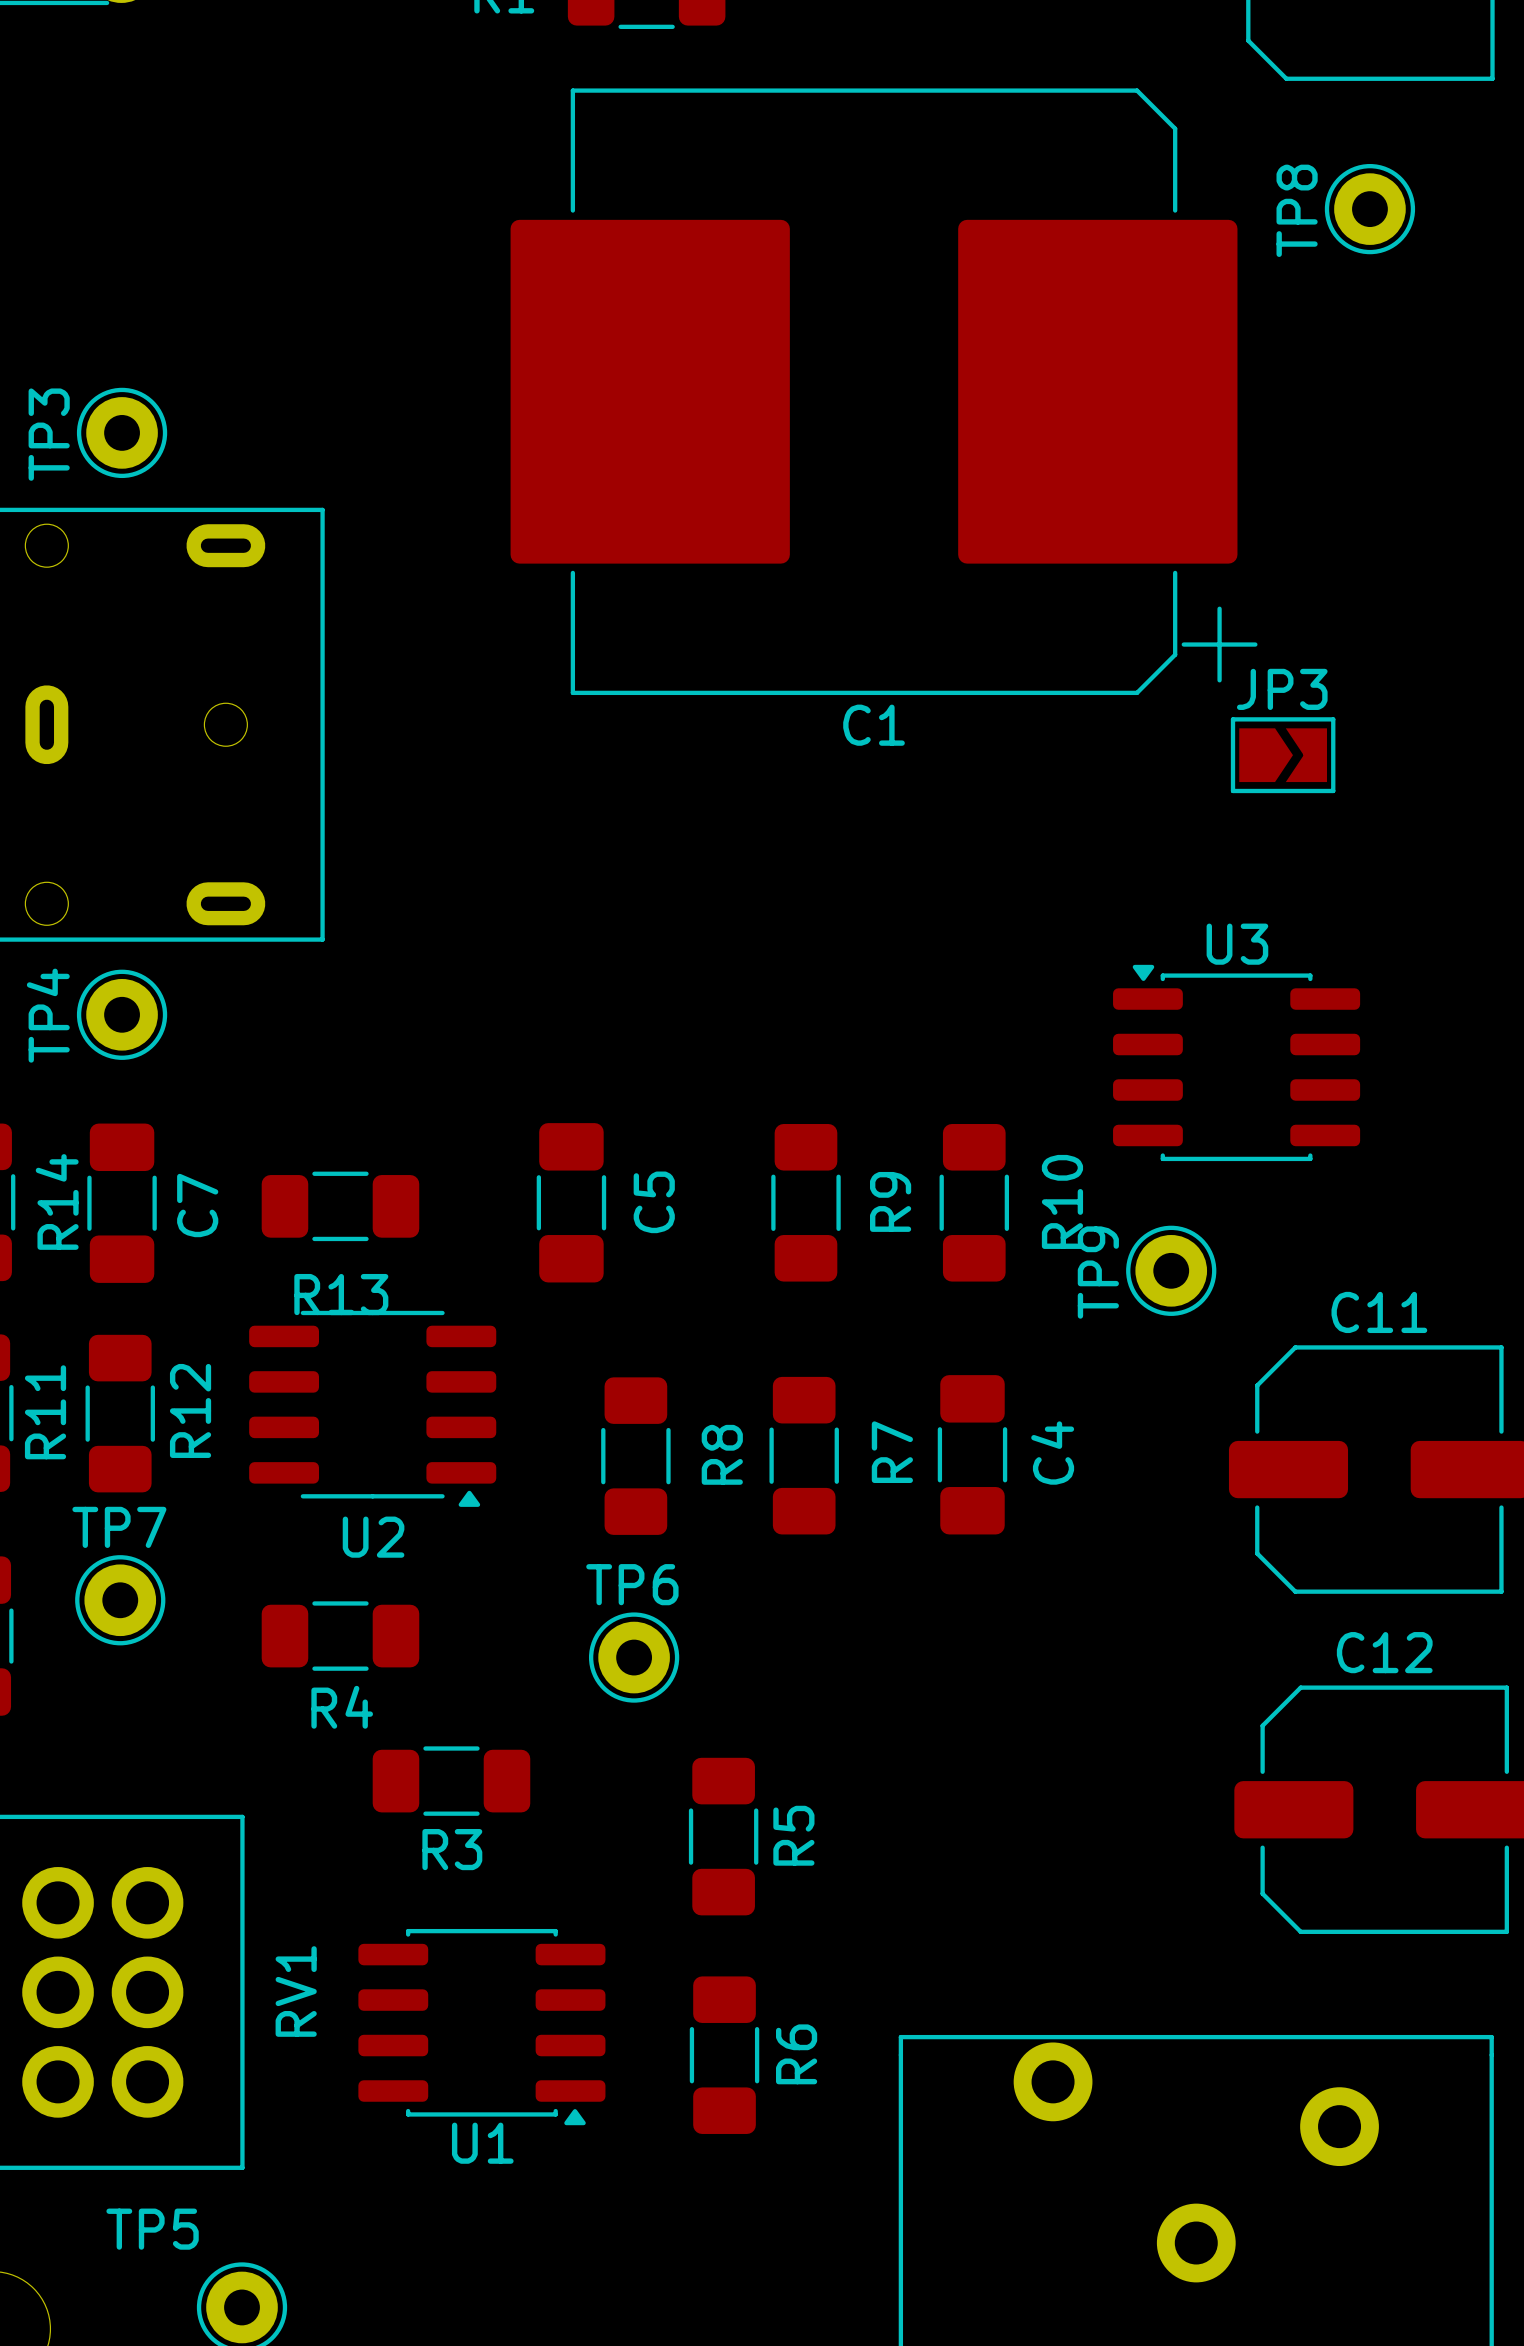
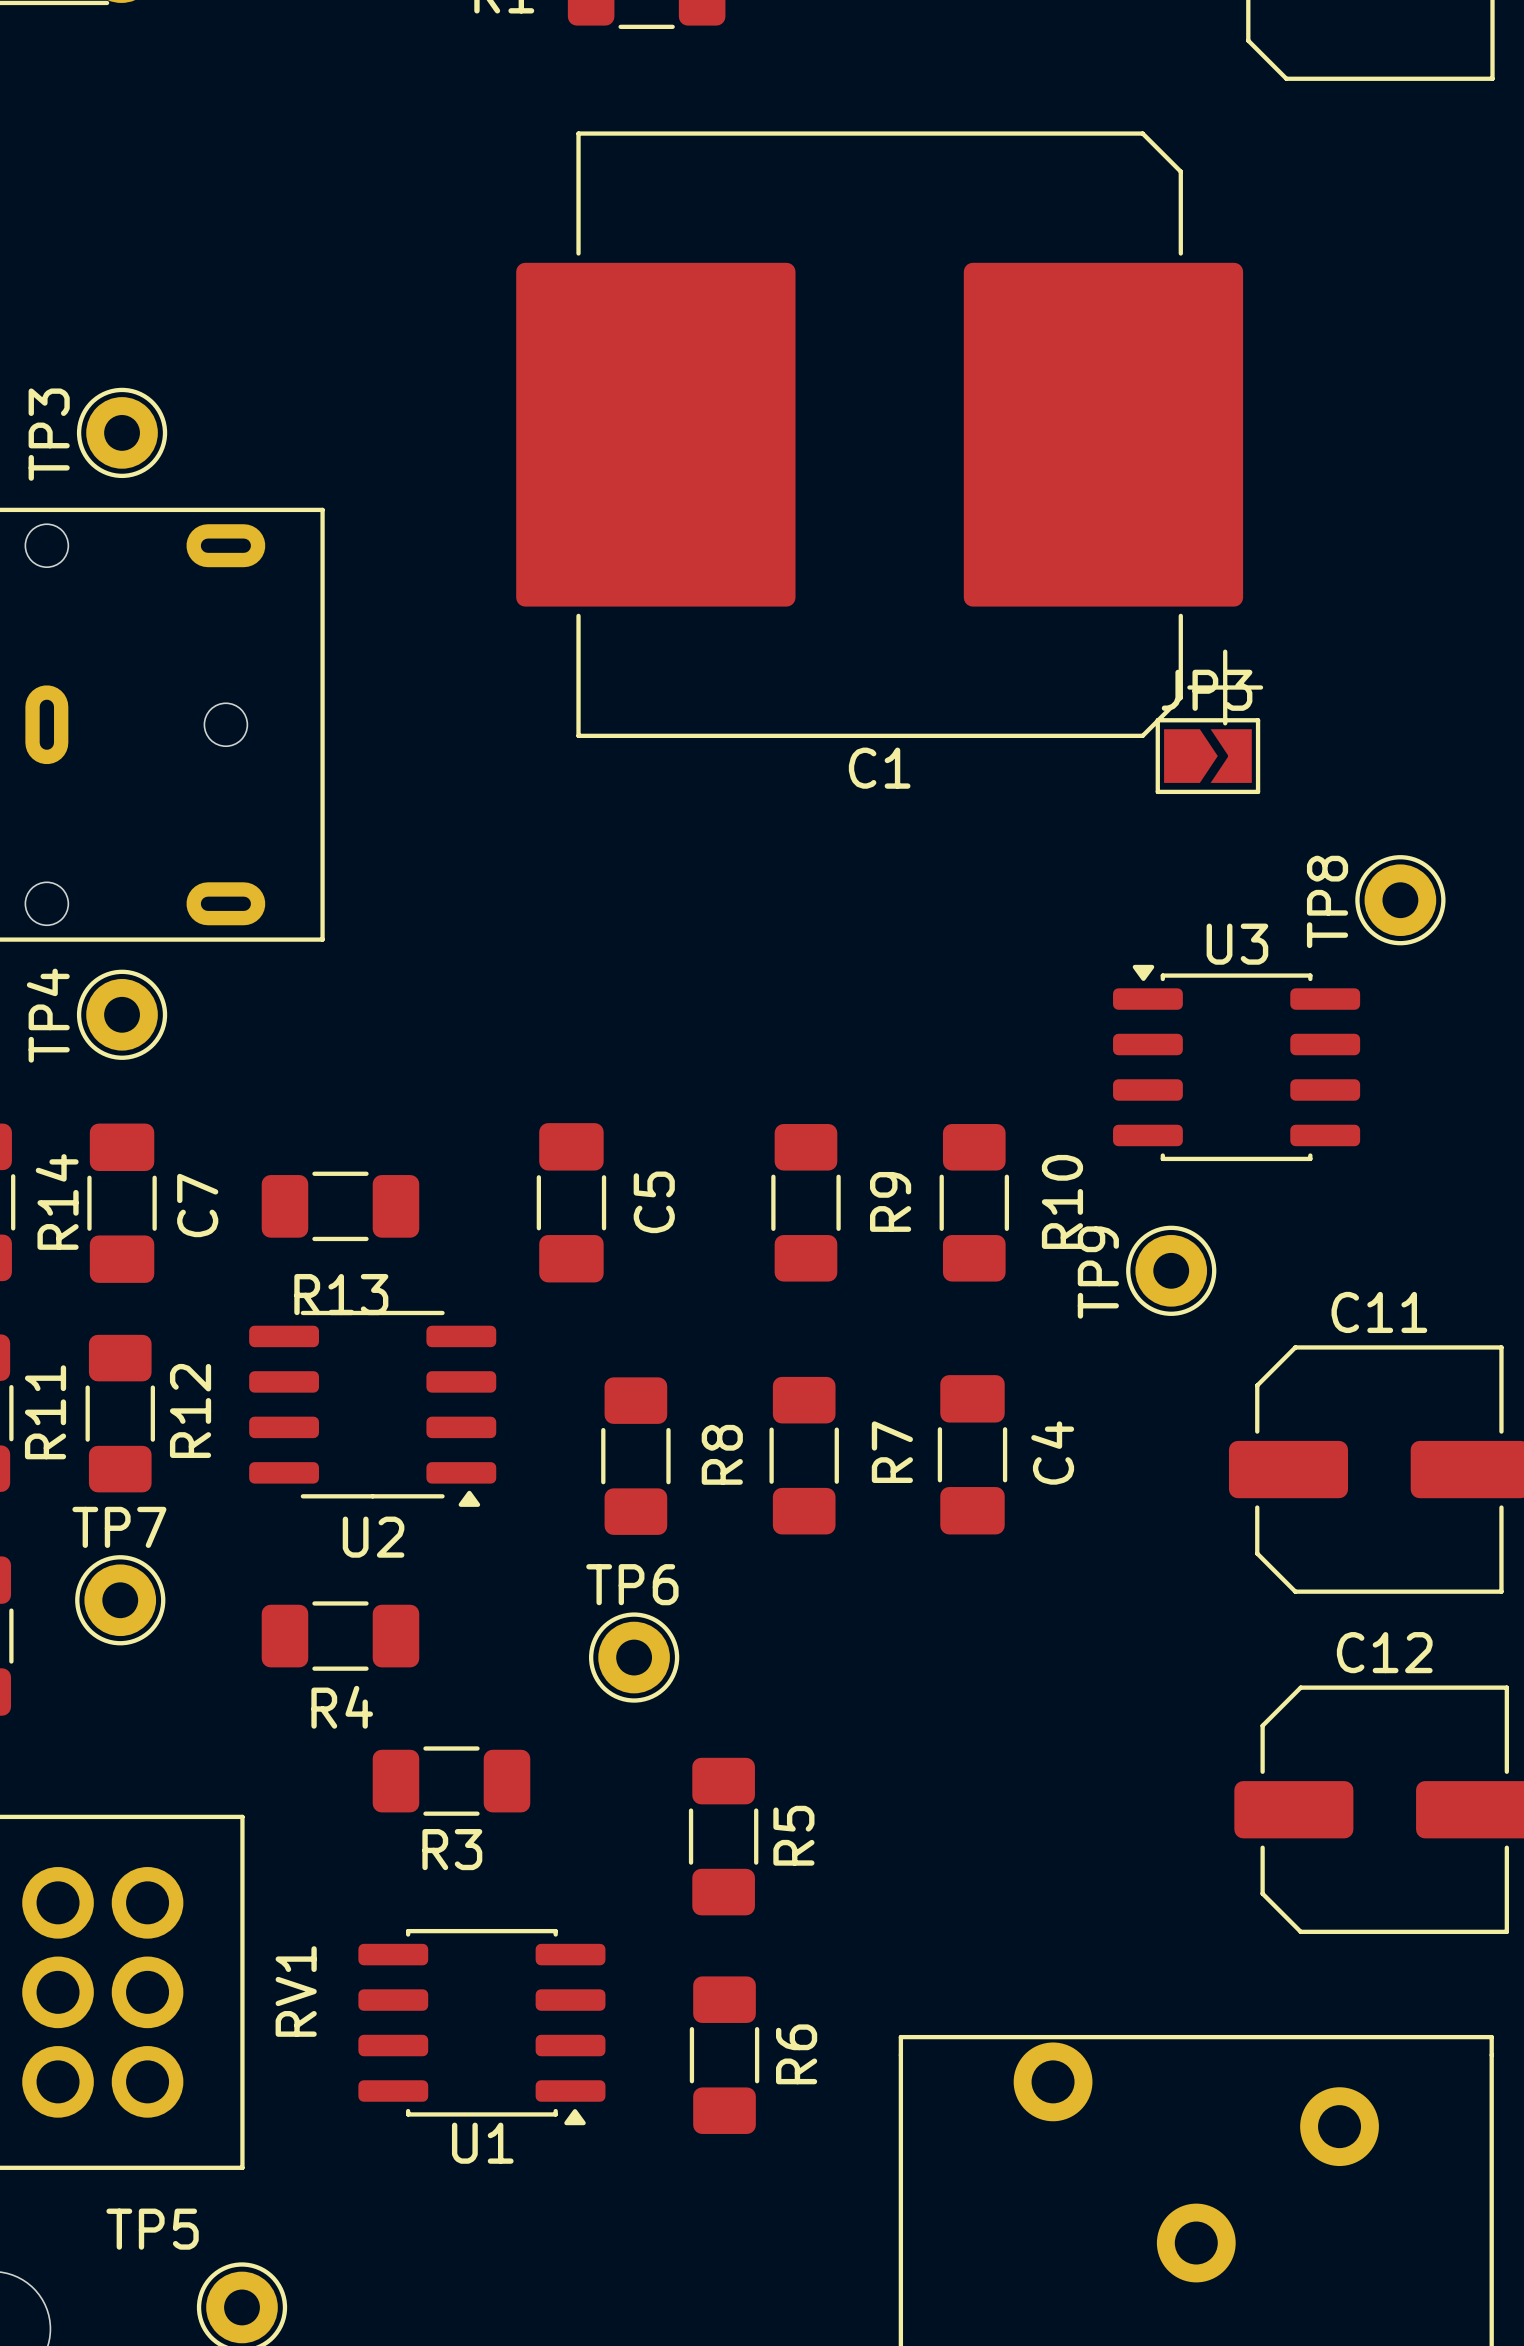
TP8 position: (1369, 209) -> (1400, 900)
C1 position: (884, 391) -> (889, 434)
JP3 position: (1283, 755) -> (1207, 756)

